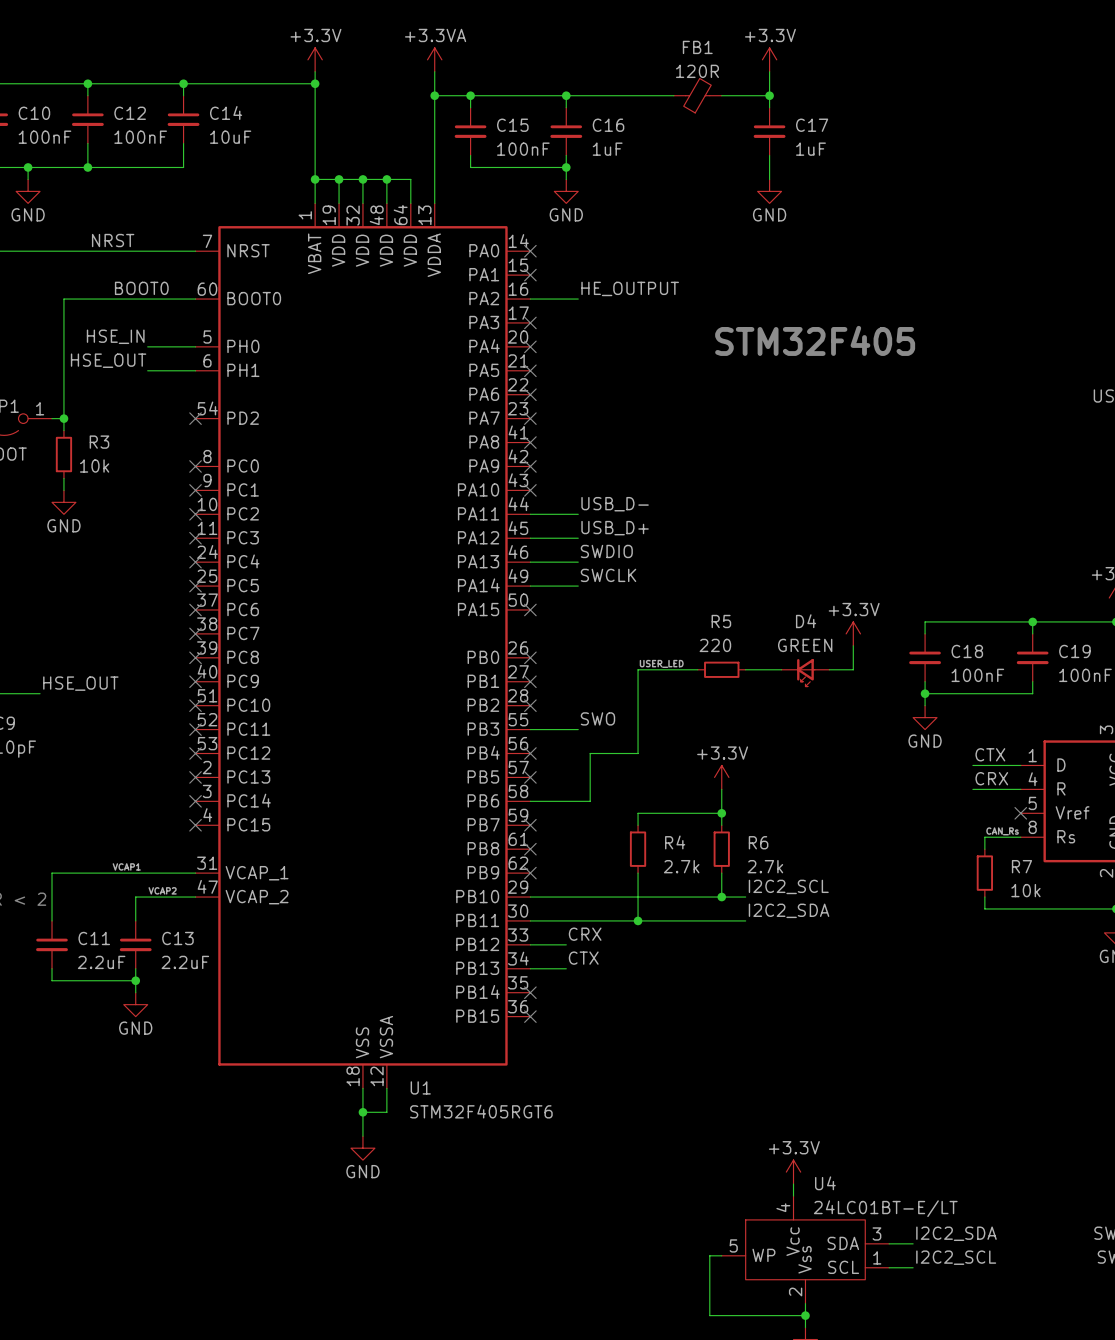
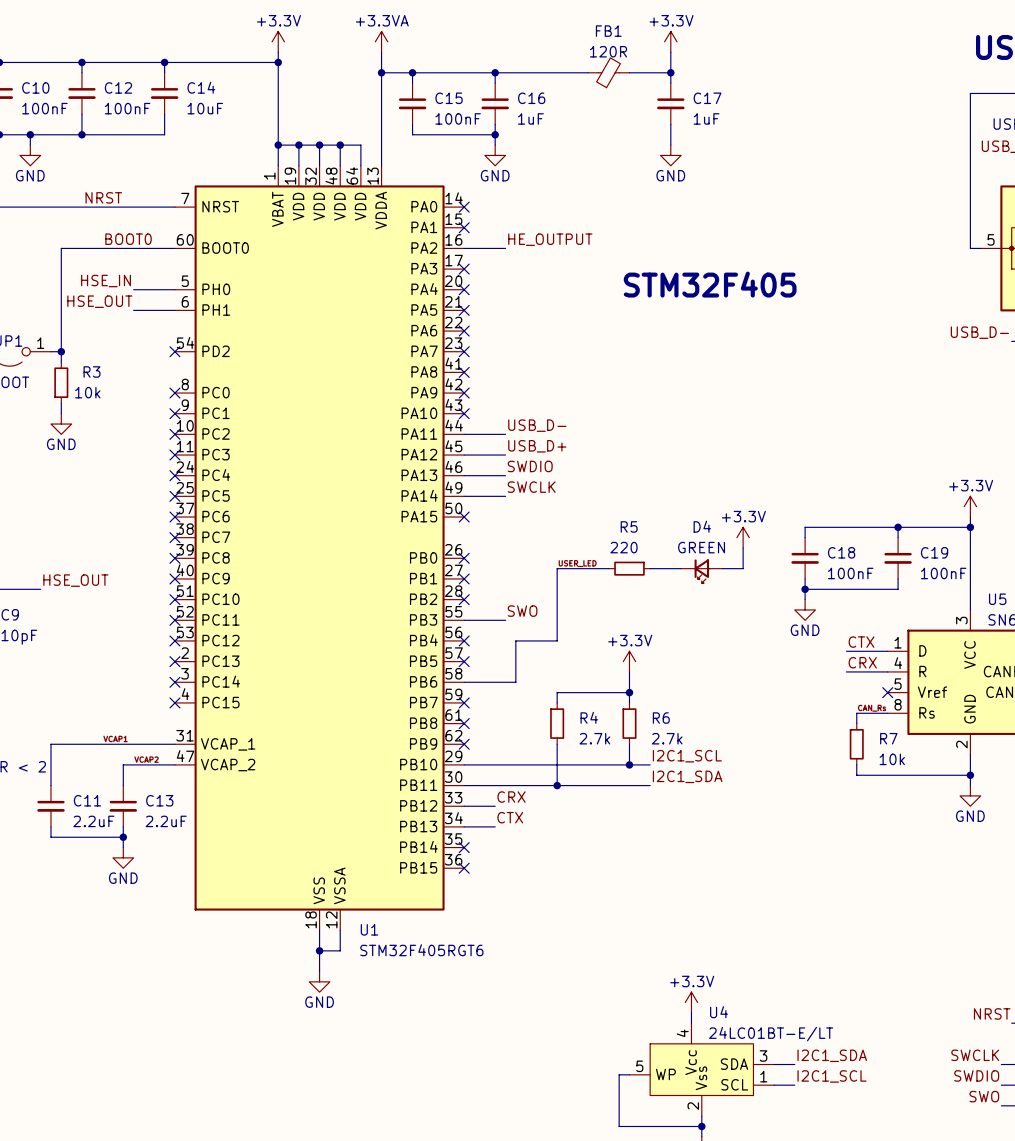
label: I2C2_SCL (788, 886) -> I2C1_SCL (687, 756)
label: I2C2_SDA (789, 910) -> I2C1_SDA (687, 776)
label: I2C2_SDA (956, 1233) -> I2C1_SDA (832, 1055)
label: I2C2_SCL (956, 1257) -> I2C1_SCL (831, 1076)

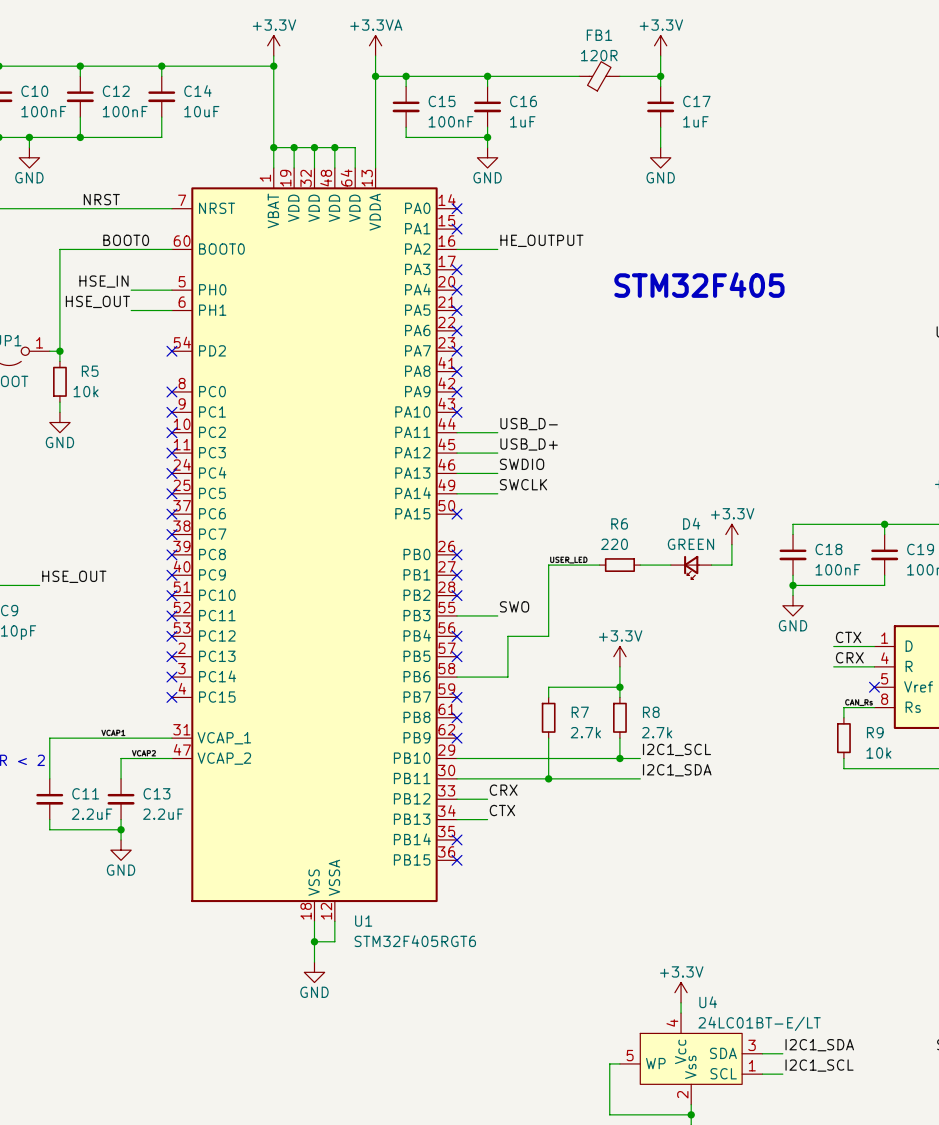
R3 name: R3 (91, 371) -> R5 (90, 371)
R5 name: R5 (629, 526) -> R6 (619, 523)
R4 name: R4 (589, 717) -> R7 (580, 712)
R6 name: R6 (661, 718) -> R8 (651, 712)
R7 name: R7 (888, 738) -> R9 (875, 732)

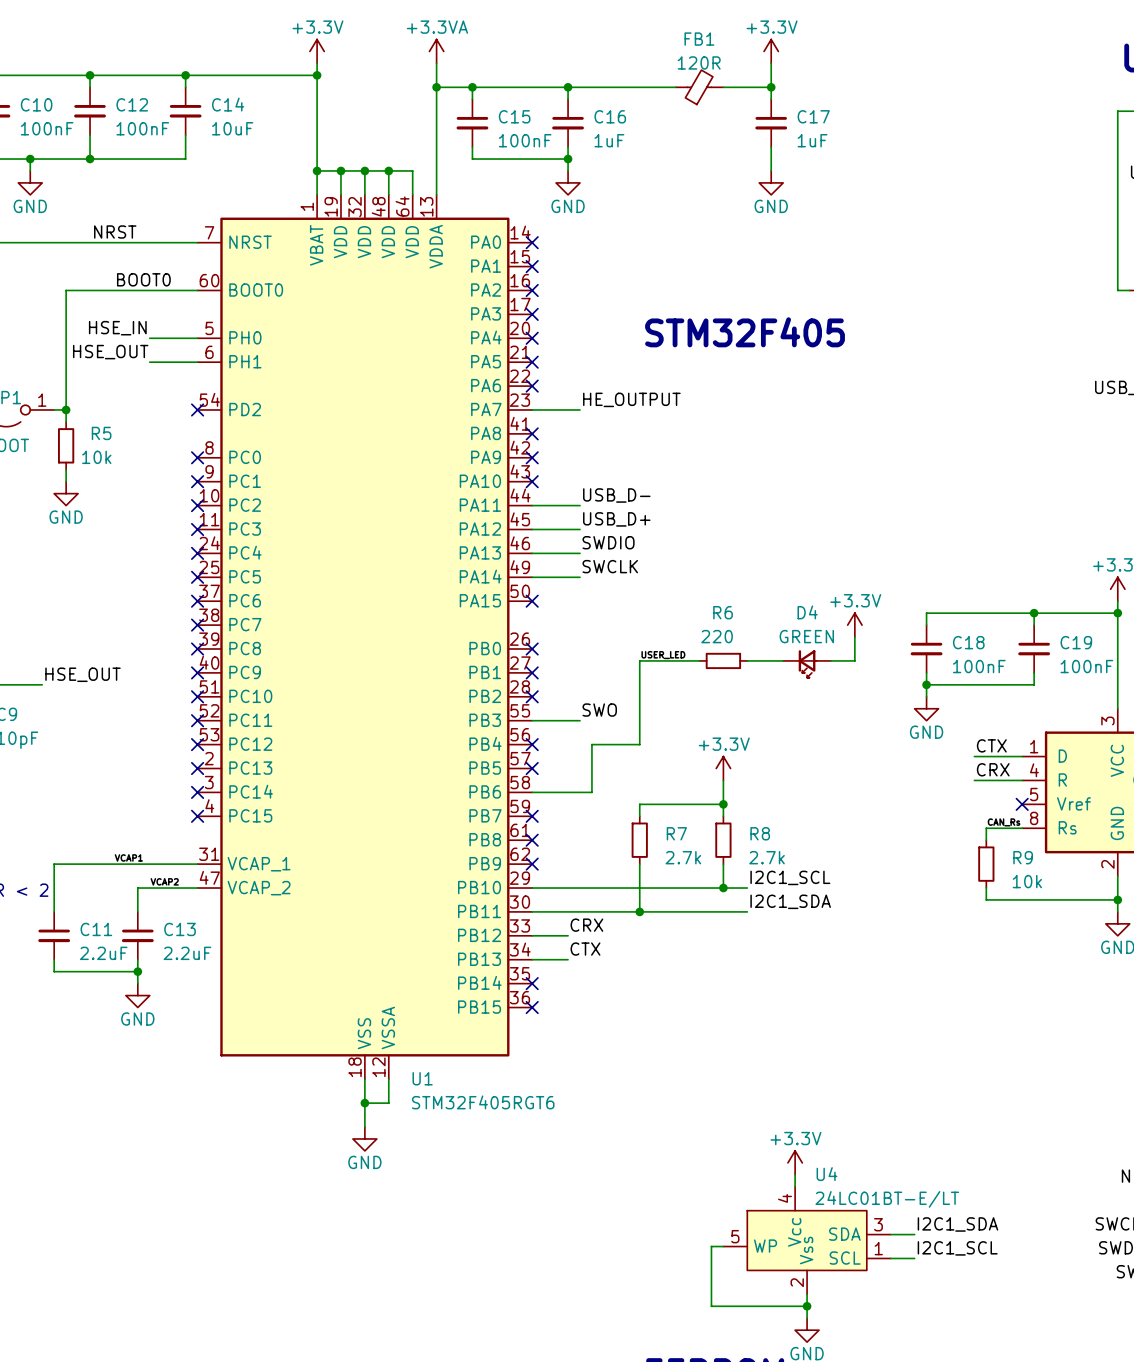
label position: HE_OUTPUT (541, 240) -> HE_OUTPUT (631, 399)
wire: (457, 249) (497, 249) -> (532, 409) (580, 409)
no-connect mark: none -> (532, 290)
text position: STM32F405 (699, 285) -> STM32F405 (745, 332)
no-connect mark: (457, 351) -> none

